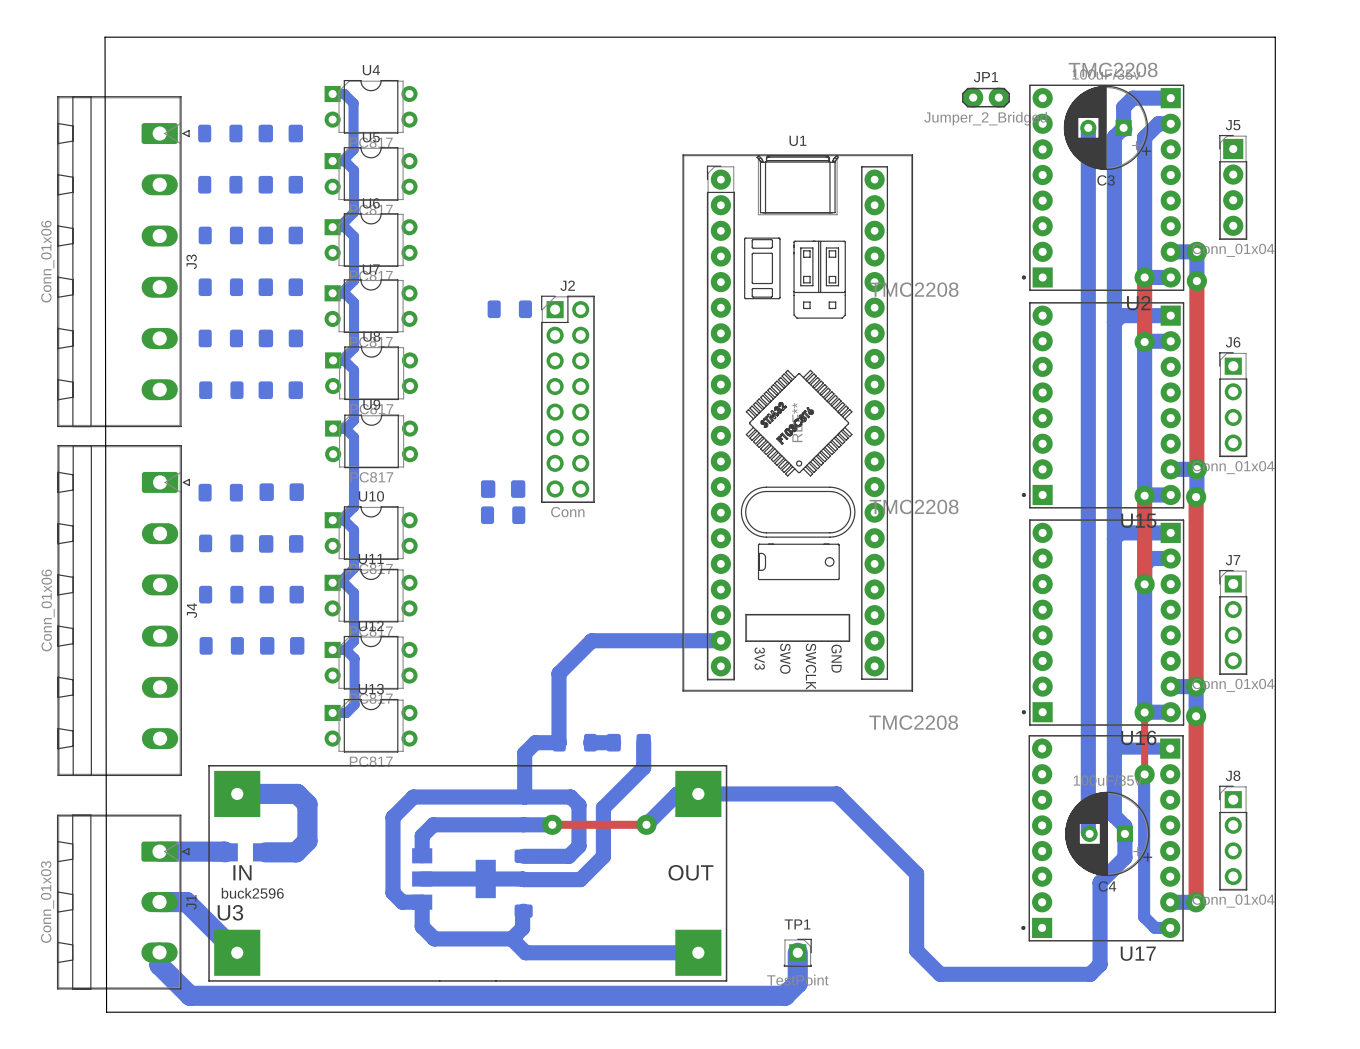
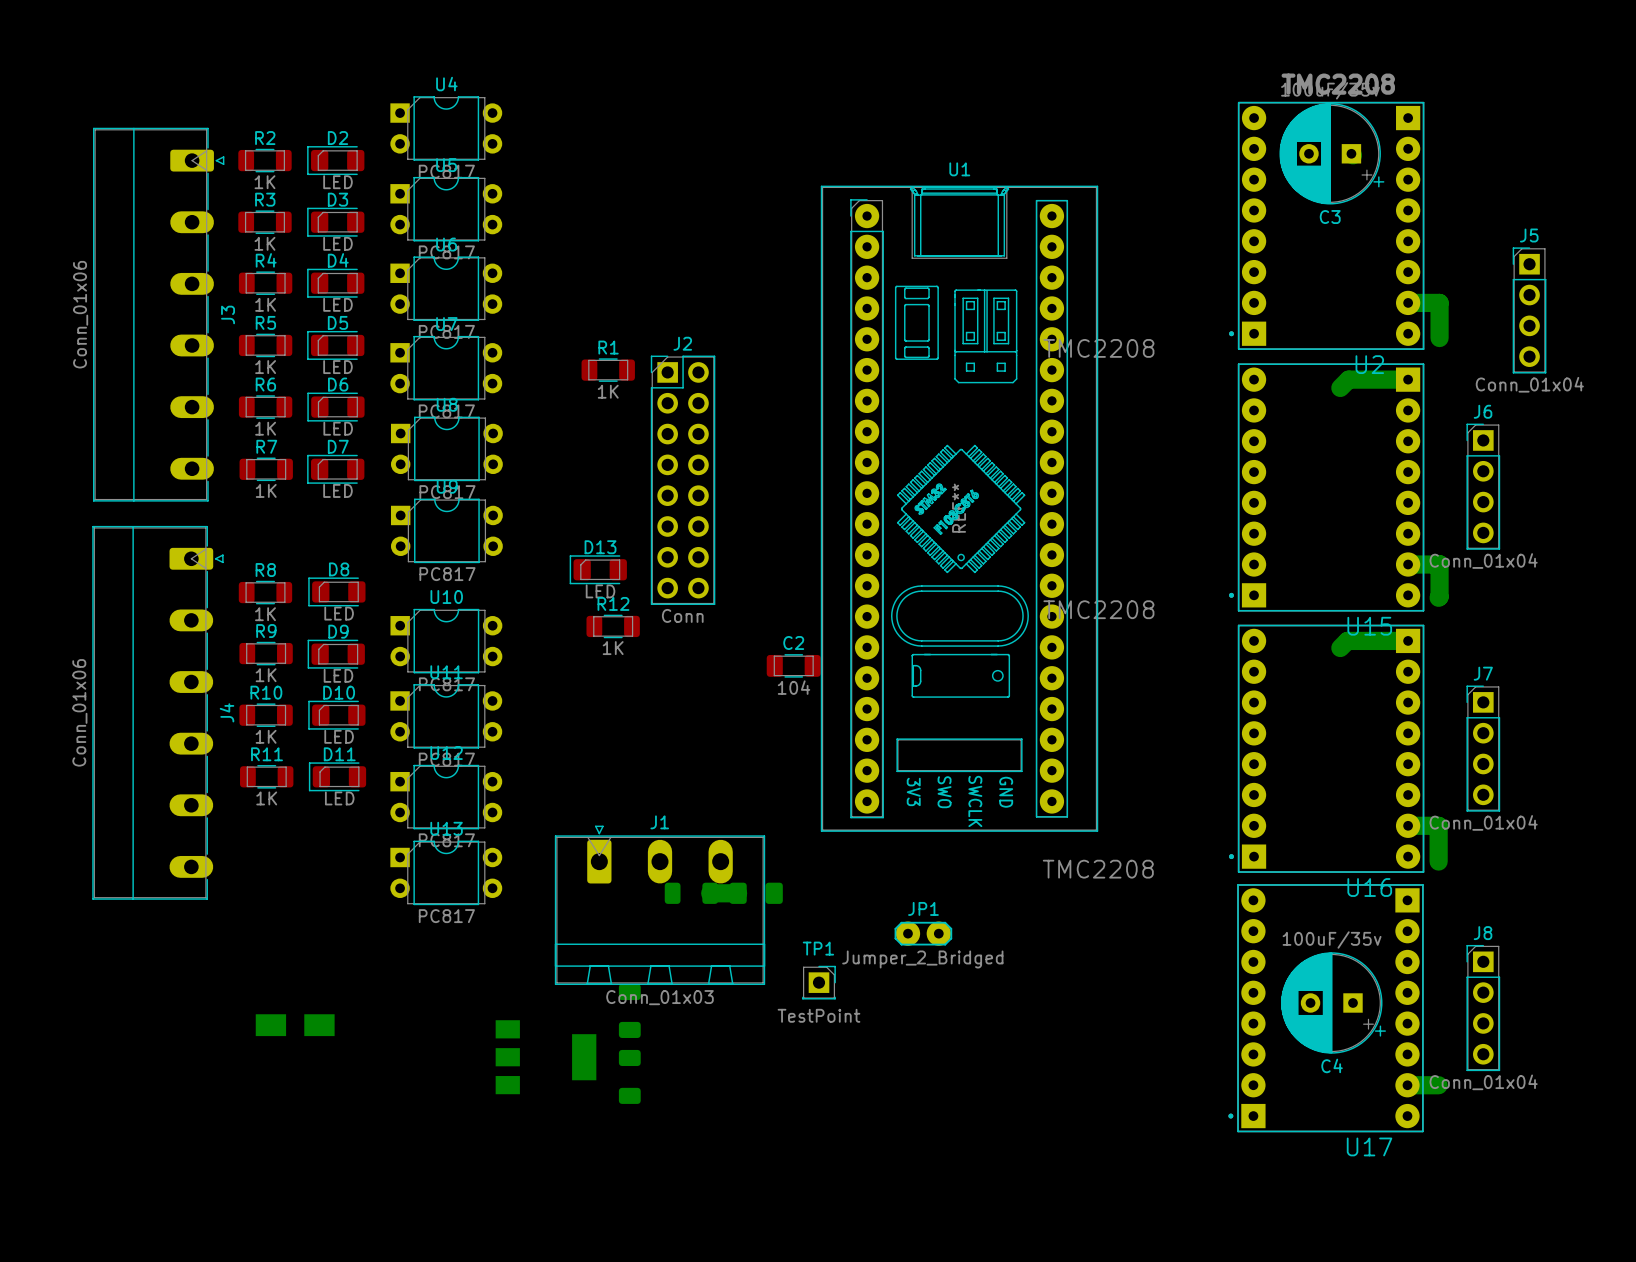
board edge: (105, 37) (1275, 37) (1275, 1012) (106, 1012) (105, 37) -> none
bottom track: (332, 94) (344, 94) (353, 103) (353, 149) (342, 161) -> none
J3 footprint: [57, 96, 190, 428] -> [92, 127, 225, 502]
JP1 position: (986, 97) -> (923, 933)
bottom track: (1170, 98) (1132, 98) (1123, 107) (1123, 127) (1114, 137) (1114, 815) (1124, 826) (1124, 857) (1100, 882) (1100, 964) (1090, 974) (940, 974) (916, 950) (916, 873) (836, 793) (677, 793) (646, 824) -> none
bottom track: (1170, 123) (1158, 123) (1144, 137) (1144, 277) (1170, 277) -> none
bottom track: (1088, 127) (1089, 833) -> none
R2 side: bottom (220, 133) -> top (264, 160)
D2 side: bottom (280, 133) -> top (335, 160)
J5 footprint: [1219, 134, 1248, 240] -> [1512, 247, 1547, 374]
bottom track: (332, 161) (344, 161) (354, 170) (354, 212) (339, 227) -> none
R3 side: bottom (220, 184) -> top (264, 222)
D3 side: bottom (280, 184) -> top (335, 222)
bottom track: (332, 227) (344, 227) (354, 236) (354, 280) (341, 293) -> none
R4 side: bottom (220, 235) -> top (265, 283)
D4 side: bottom (280, 235) -> top (335, 283)
via: (1196, 251) -> none
top track: (1144, 277) (1144, 342) -> none
via: (1144, 277) -> none
top track: (1196, 281) (1196, 469) -> none
via: (1196, 281) -> none
R5 side: bottom (220, 287) -> top (265, 345)
D5 side: bottom (280, 287) -> top (335, 345)
bottom track: (332, 293) (344, 293) (354, 302) (354, 348) (341, 360) -> none
R1 side: bottom (509, 309) -> top (608, 370)
R6 side: bottom (220, 338) -> top (265, 407)
D6 side: bottom (280, 338) -> top (335, 407)
bottom track: (1170, 341) (1144, 342) (1144, 495) (1170, 494) -> none
via: (1144, 342) -> none
bottom track: (333, 360) (344, 360) (354, 370) (354, 420) (345, 428) (333, 428) -> none
R7 side: bottom (221, 390) -> top (266, 469)
D7 side: bottom (280, 390) -> top (335, 469)
bottom track: (345, 428) (354, 437) (354, 507) (340, 520) -> none
J4 footprint: [57, 445, 191, 777] -> [92, 525, 224, 900]
via: (1196, 469) -> none
D13 side: bottom (503, 489) -> top (598, 569)
R8 side: bottom (220, 492) -> top (265, 592)
D8 side: bottom (281, 492) -> top (336, 591)
top track: (1144, 495) (1144, 584) -> none
via: (1144, 495) -> none
top track: (1196, 497) (1196, 686) -> none
via: (1196, 497) -> none
R12 side: bottom (503, 515) -> top (613, 626)
bottom track: (332, 520) (344, 520) (354, 530) (354, 568) (339, 582) -> none
R9 side: bottom (221, 543) -> top (266, 653)
D9 side: bottom (281, 543) -> top (336, 654)
C2: none -> 104 (793, 665)
bottom track: (1170, 558) (1151, 558) (1144, 564) (1144, 712) (1170, 712) -> none
bottom track: (332, 582) (343, 582) (354, 593) (354, 641) (345, 649) -> none
via: (1144, 584) -> none
R10 side: bottom (221, 594) -> top (266, 715)
D10 side: bottom (281, 594) -> top (336, 715)
bottom track: (720, 640) (591, 640) (558, 673) (559, 742) (535, 742) (524, 753) (524, 797) -> none
R11 side: bottom (221, 645) -> top (266, 776)
D11 side: bottom (282, 645) -> top (337, 776)
bottom track: (332, 649) (345, 649) (354, 658) (354, 704) (346, 712) (332, 712) -> none
via: (1196, 686) -> none
top track: (1144, 712) (1144, 774) -> none
via: (1144, 712) -> none
top track: (1196, 716) (1196, 902) -> none
via: (1196, 716) -> none
bottom track: (643, 742) (643, 767) (603, 807) (603, 856) (580, 879) (422, 879) -> none
bottom track: (1170, 748) (1119, 748) (1114, 753) -> none
bottom track: (1144, 774) (1144, 916) (1155, 927) (1170, 927) -> none
via: (1144, 774) -> none
bottom track: (237, 793) (297, 793) (307, 804) (307, 841) (296, 852) (265, 852) -> none
top track: (552, 824) (646, 824) -> none
bottom track: (552, 824) (433, 824) (422, 835) (422, 855) -> none
via: (552, 824) -> none
via: (646, 824) -> none
bottom track: (159, 851) (225, 852) -> none
bottom track: (523, 856) (568, 856) (578, 846) (578, 805) (570, 797) (413, 797) (392, 817) (392, 892) (402, 902) (422, 902) (422, 926) (434, 938) (511, 938) -> none
U3: buck2596 (467, 873) -> none
J1 rotation: 0° (123, 902) -> 90° counterclockwise (660, 905)
J1 position: (123, 902) -> (660, 905)
bottom track: (159, 902) (186, 902) (237, 952) -> none
via: (1196, 902) -> none
bottom track: (523, 911) (522, 928) (511, 938) -> none
bottom track: (511, 938) (525, 952) (698, 952) -> none
bottom track: (159, 952) (159, 965) (190, 995) (784, 995) (797, 983) (797, 952) -> none
TP1 position: (797, 952) -> (819, 982)

